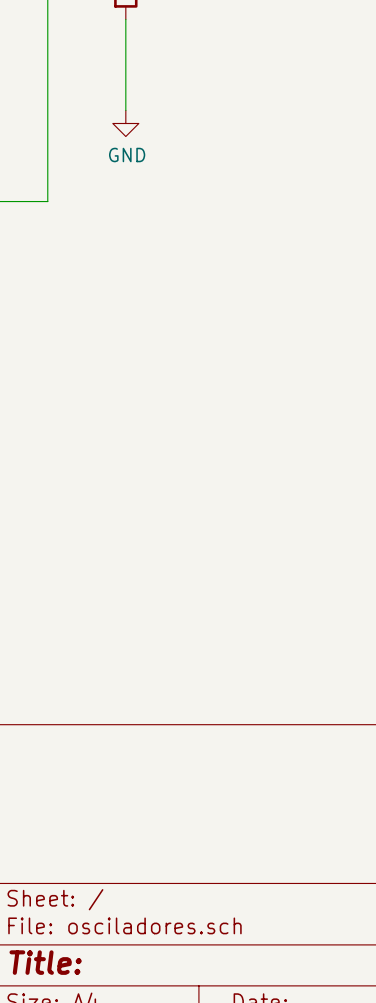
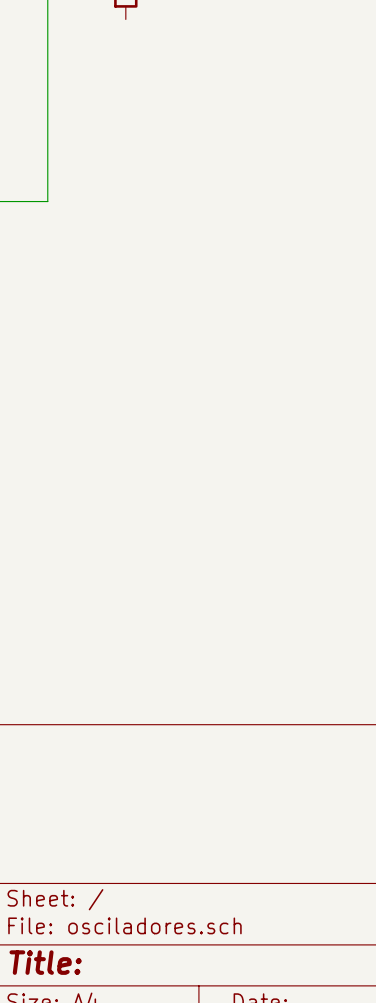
wire: (125, 19) (125, 110) -> none
power symbol: GND (125, 123) -> none

